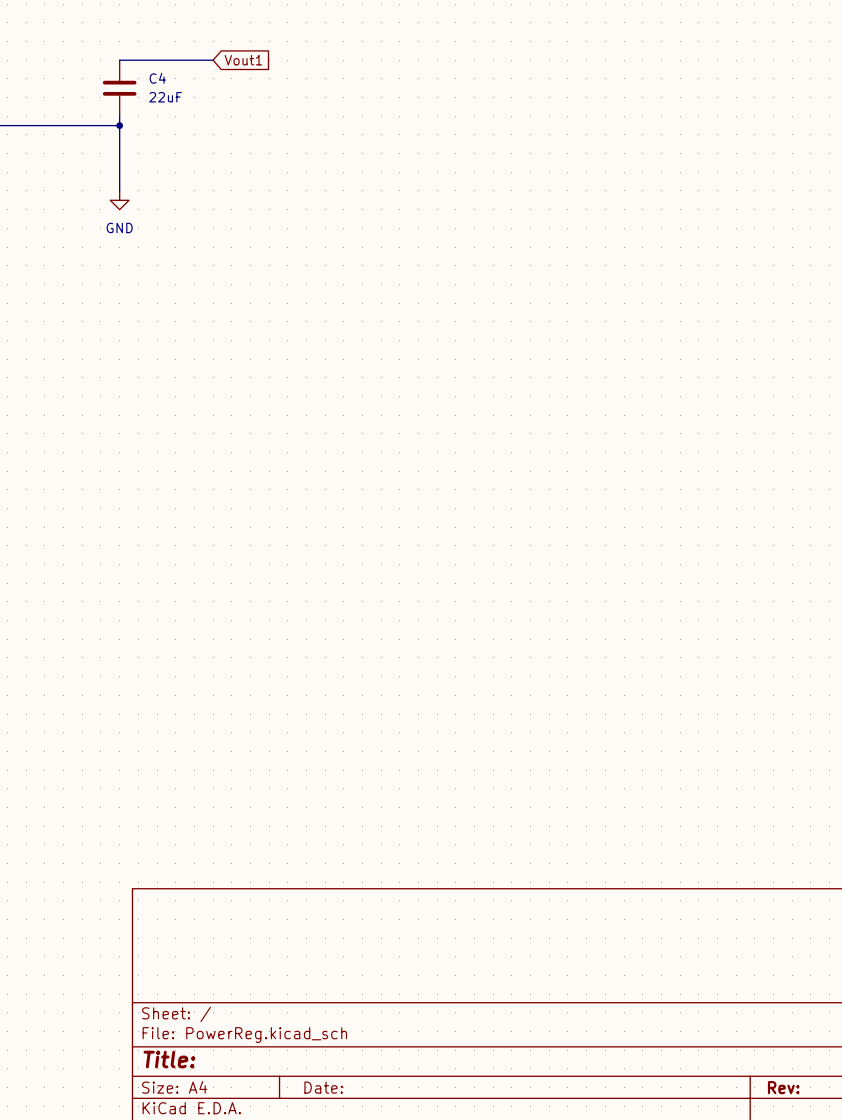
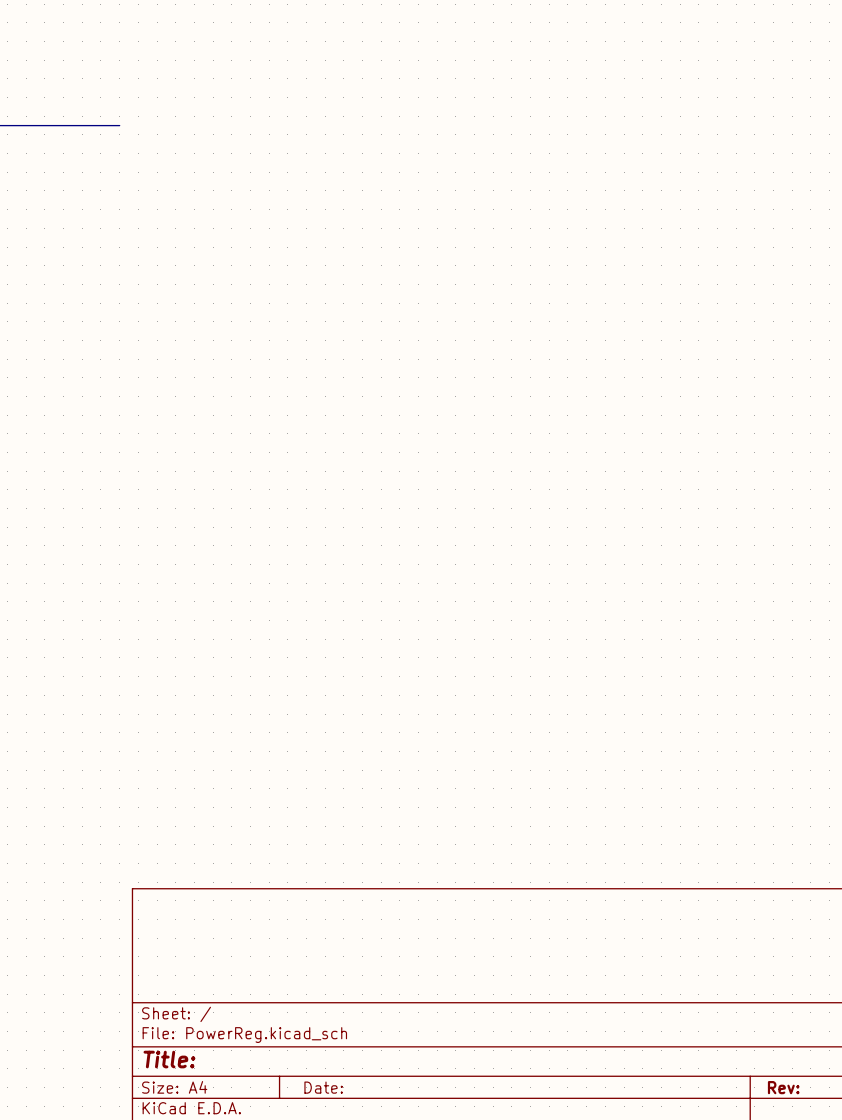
wire: (119, 60) (213, 60) -> none
global label: Vout1 (243, 60) -> none
C4: 22uF (119, 88) -> none
wire: (119, 116) (119, 190) -> none
junction: (119, 125) -> none
power symbol: GND (119, 200) -> none

